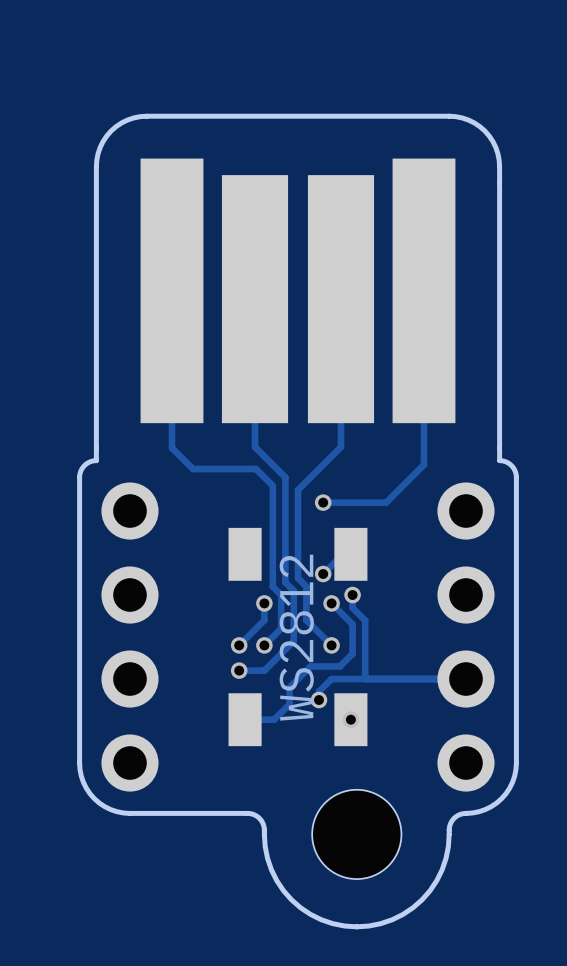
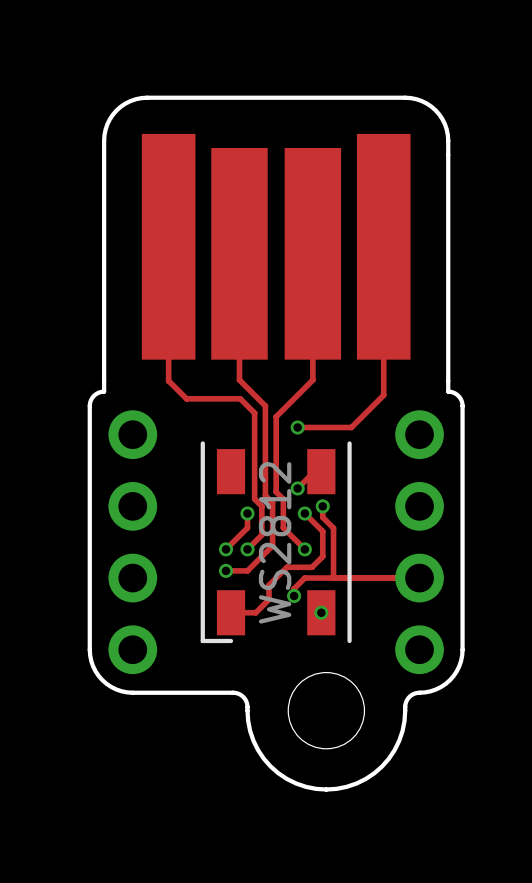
part footprint: [228, 527, 368, 747] -> [200, 441, 352, 644]

